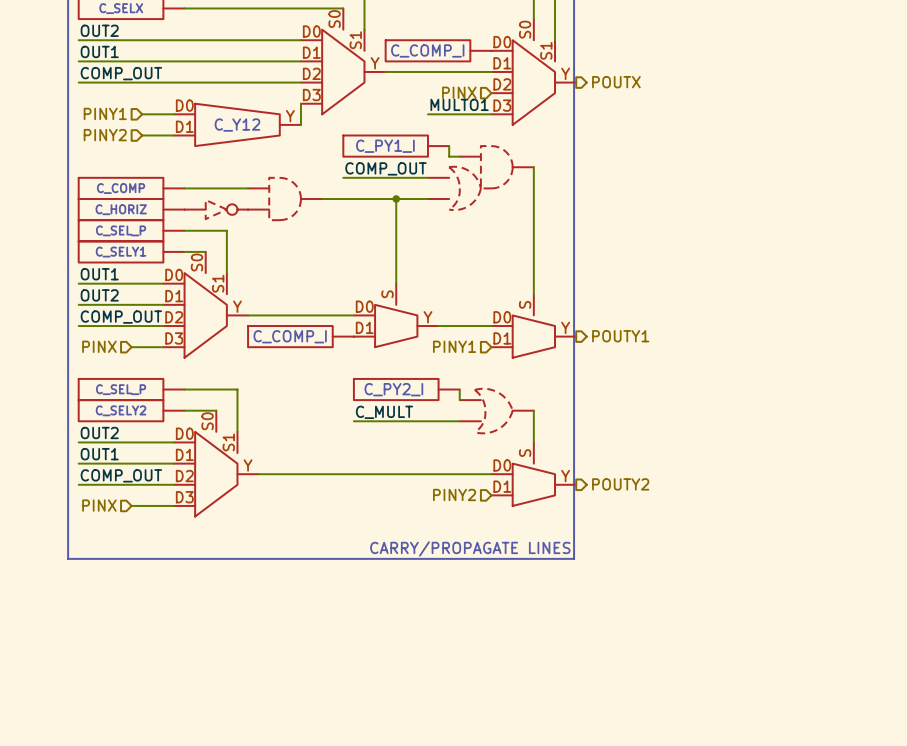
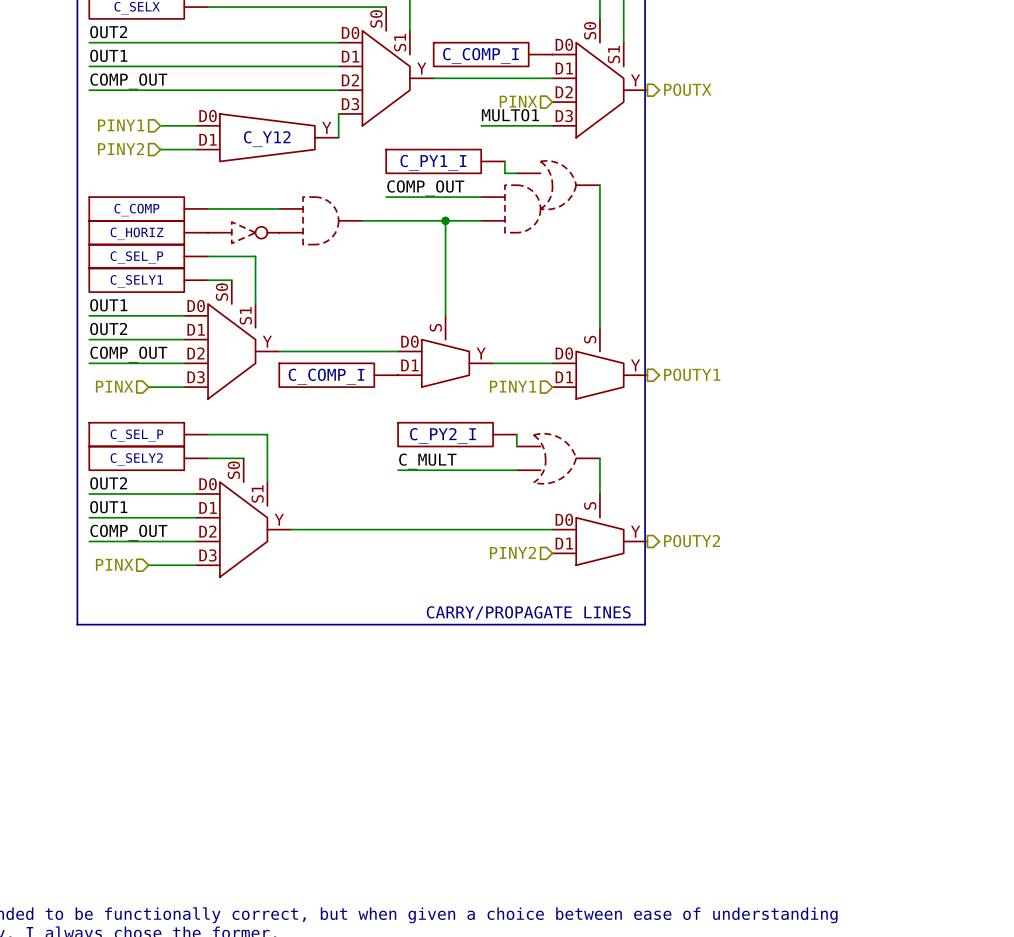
part symbol: [427, 146, 534, 211] -> [481, 160, 600, 233]

